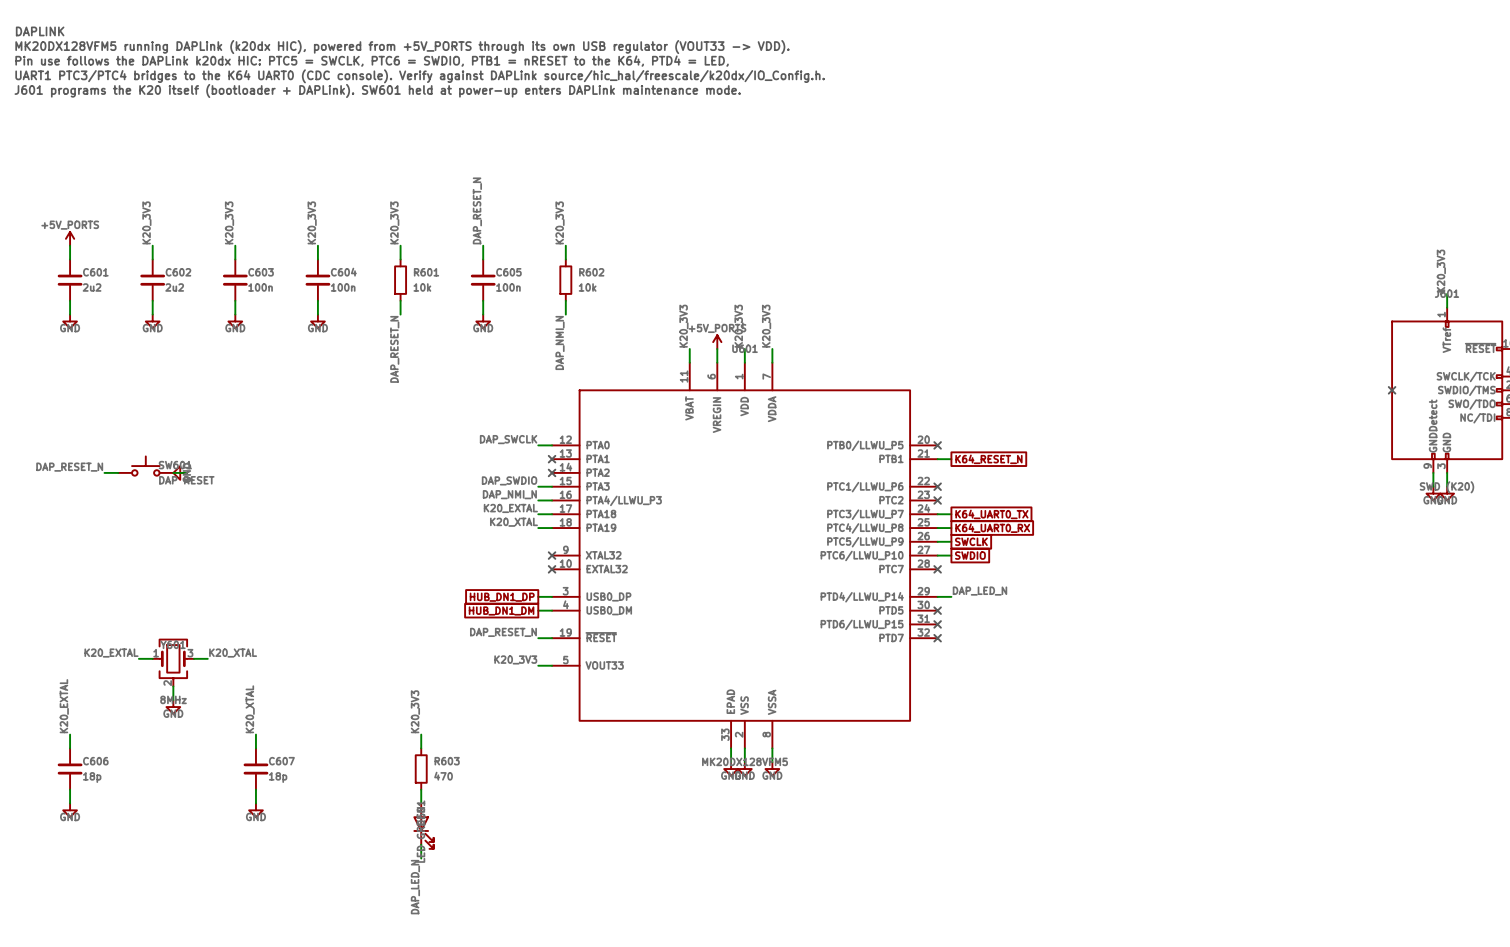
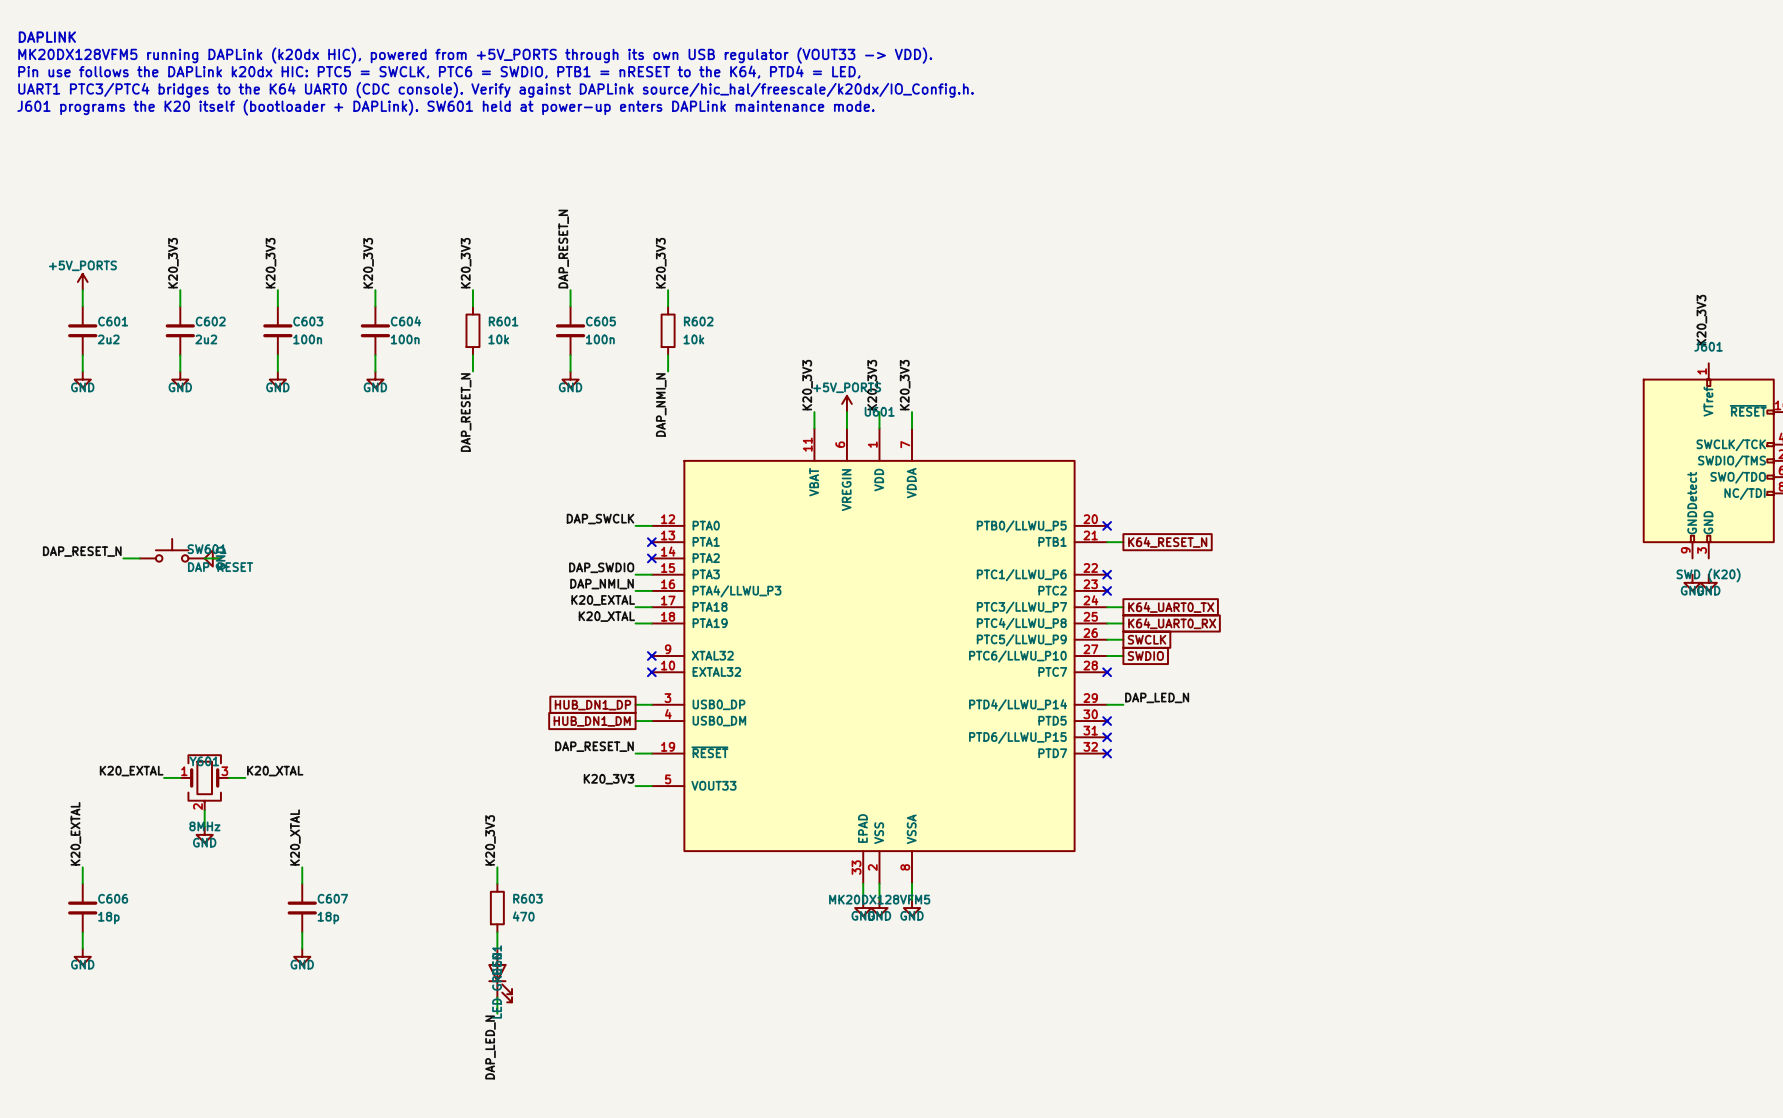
wire: (1447, 293) (1447, 307) -> none
no-connect mark: (1392, 390) -> none
wire: (1433, 472) (1433, 486) -> none
wire: (1447, 472) (1447, 486) -> none

